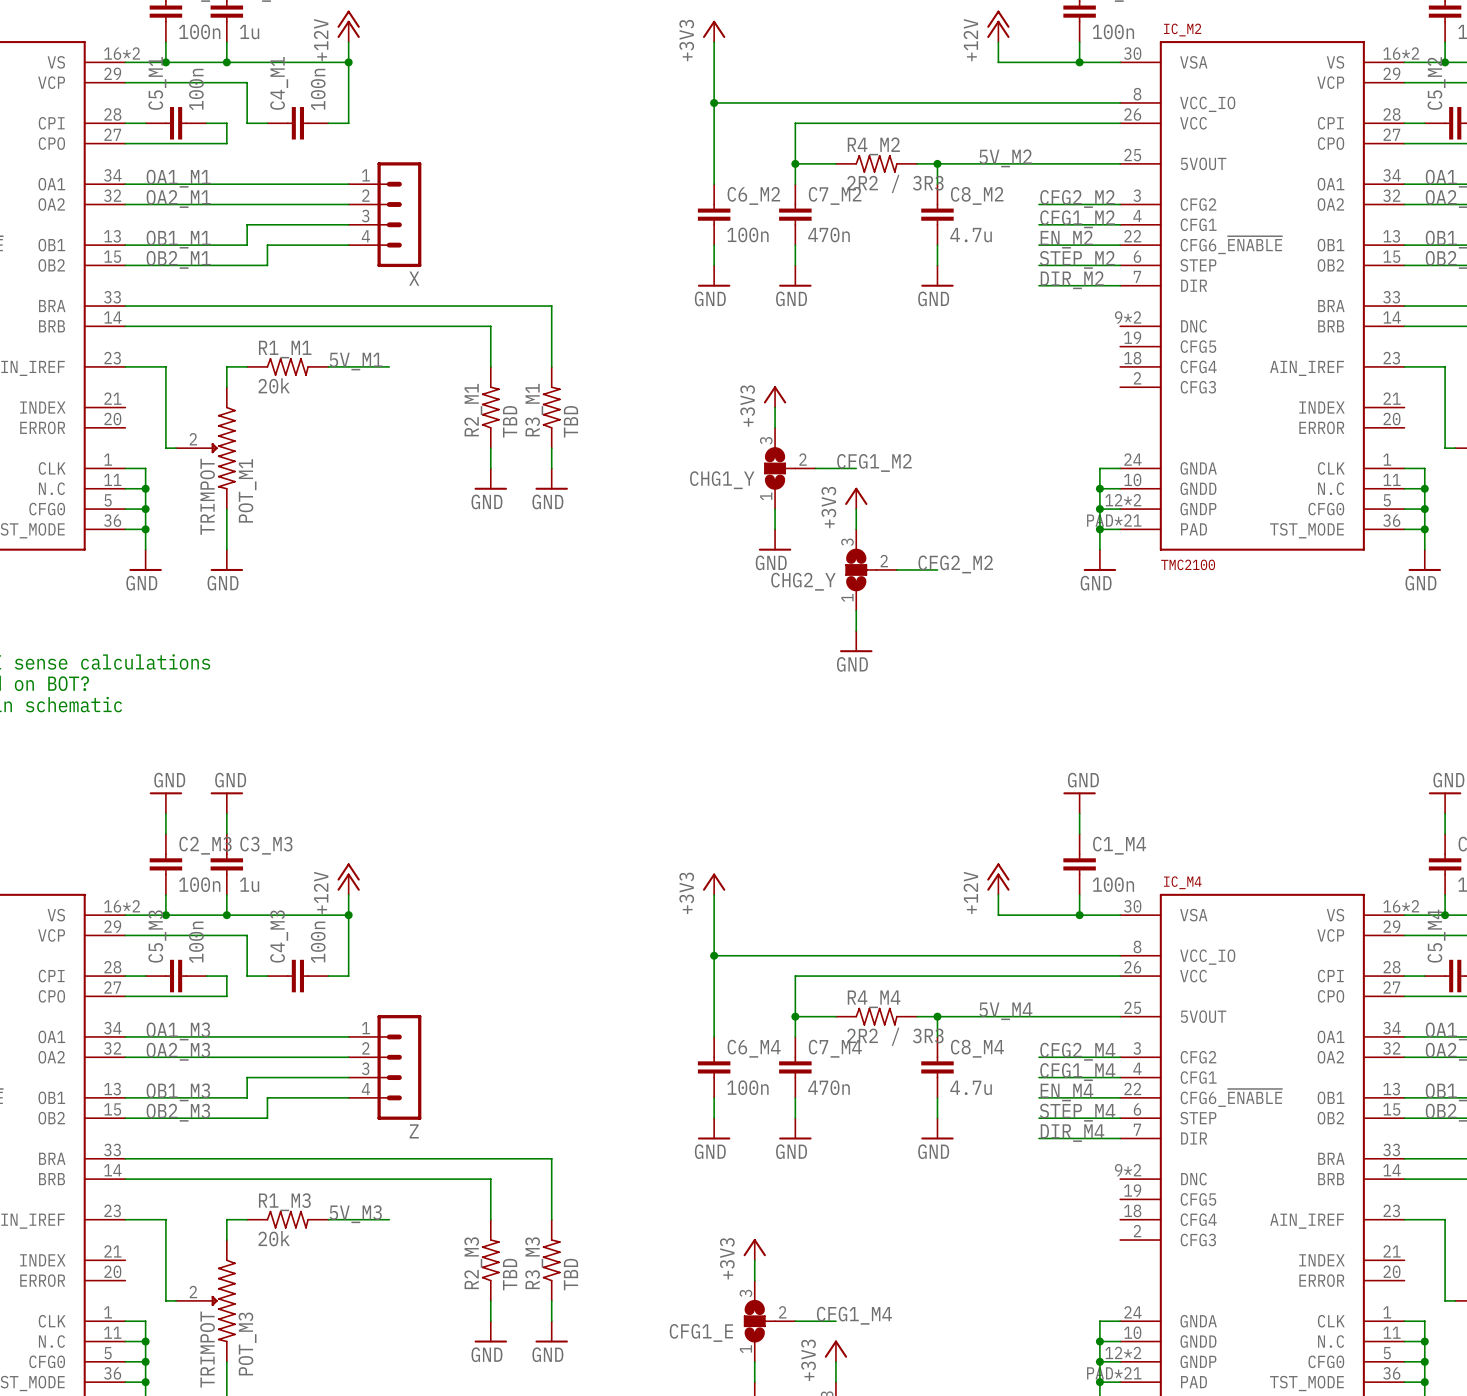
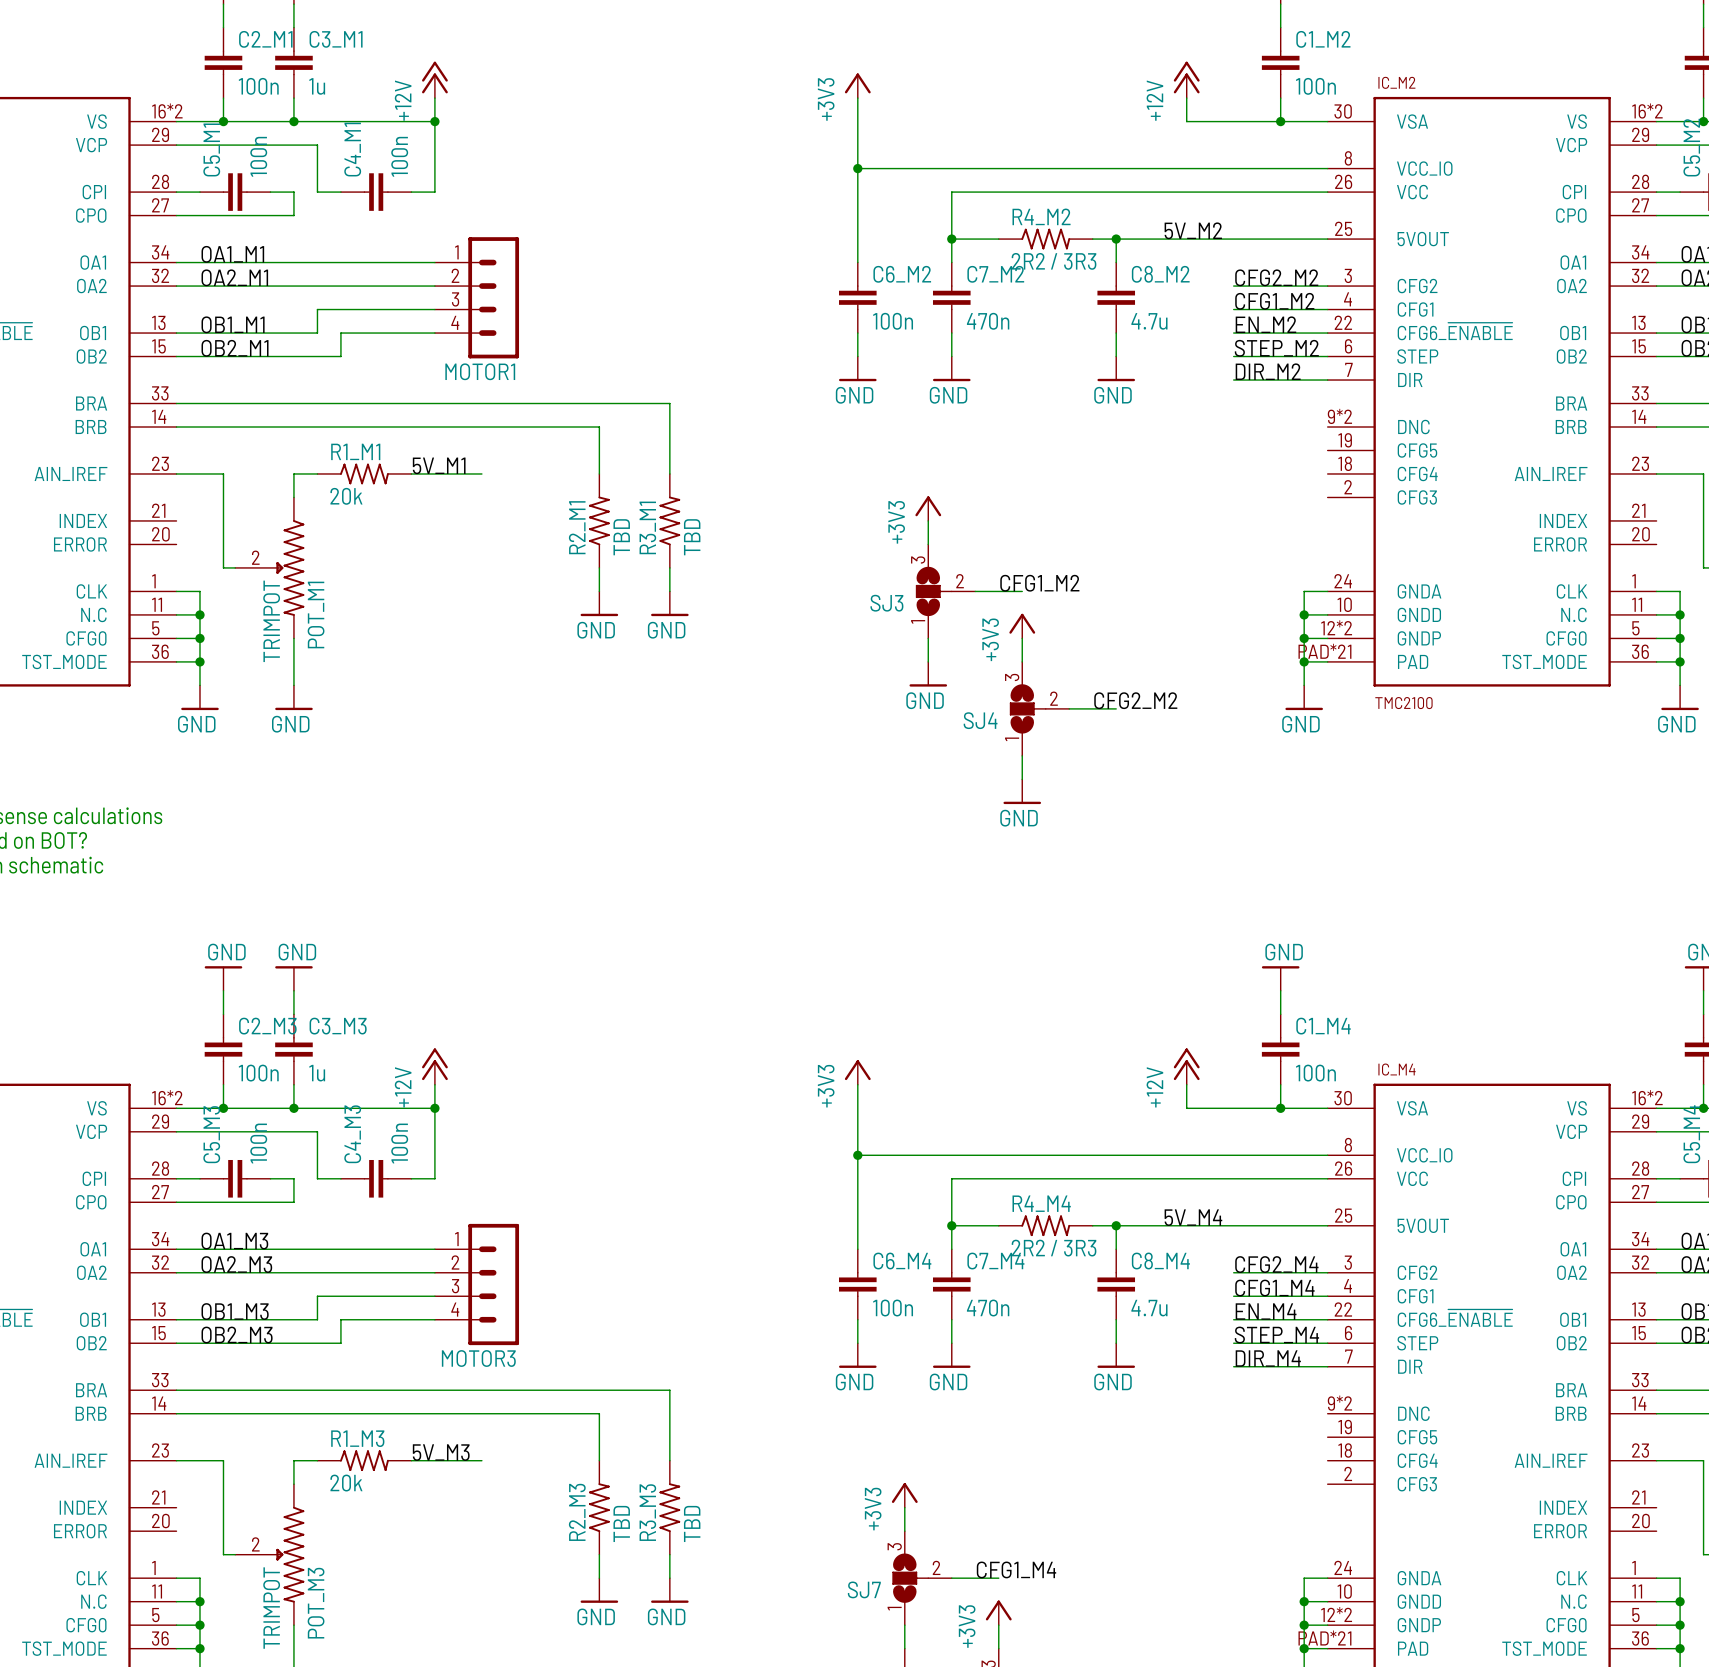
X name: X (414, 278) -> MOTOR1 (480, 371)
CHG1_Y name: CHG1_Y (722, 480) -> SJ3 (886, 603)
CHG2_Y name: CHG2_Y (803, 581) -> SJ4 (980, 720)
Z name: Z (414, 1131) -> MOTOR3 (478, 1358)
CFG1_E name: CFG1_E (701, 1332) -> SJ7 (864, 1589)

